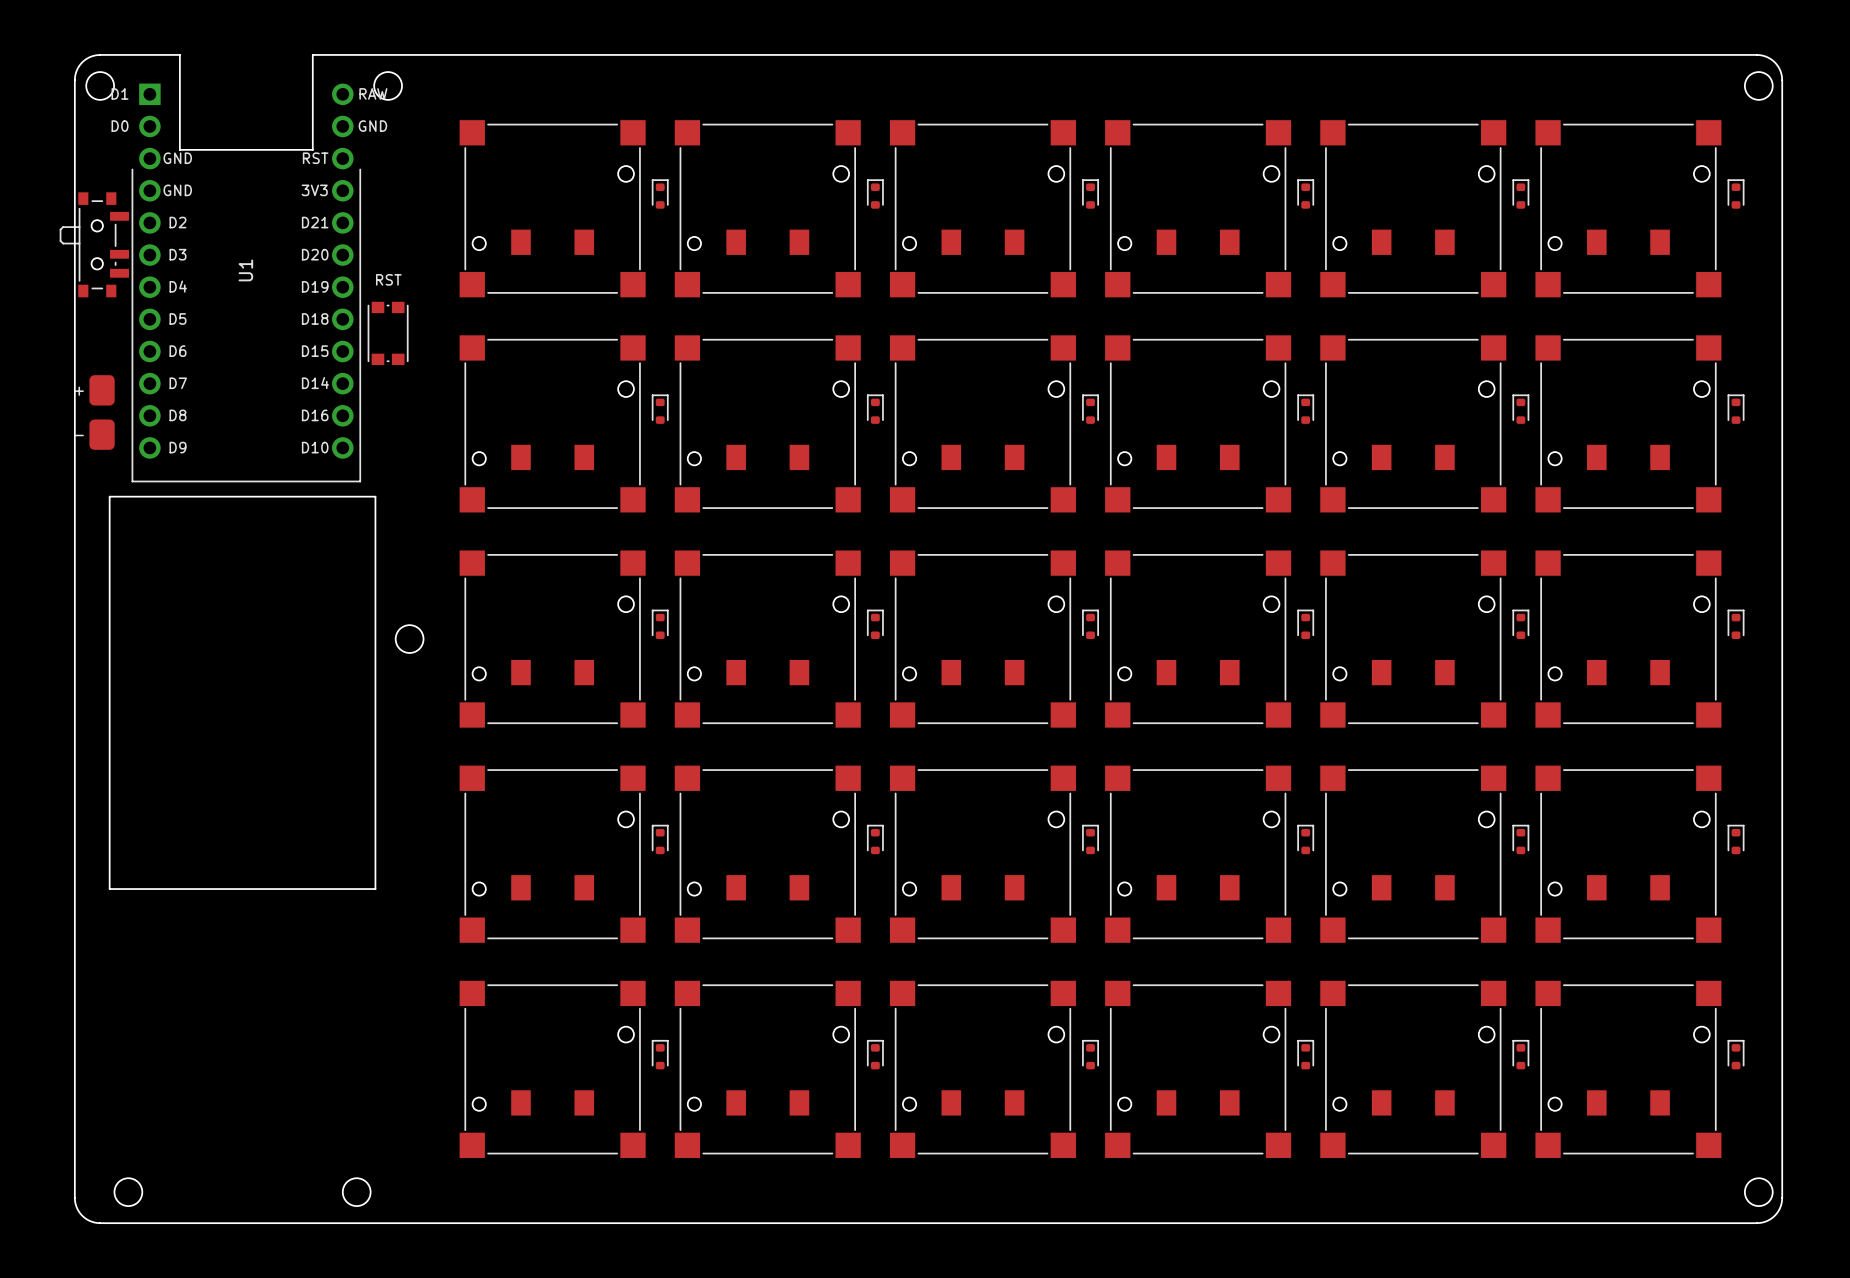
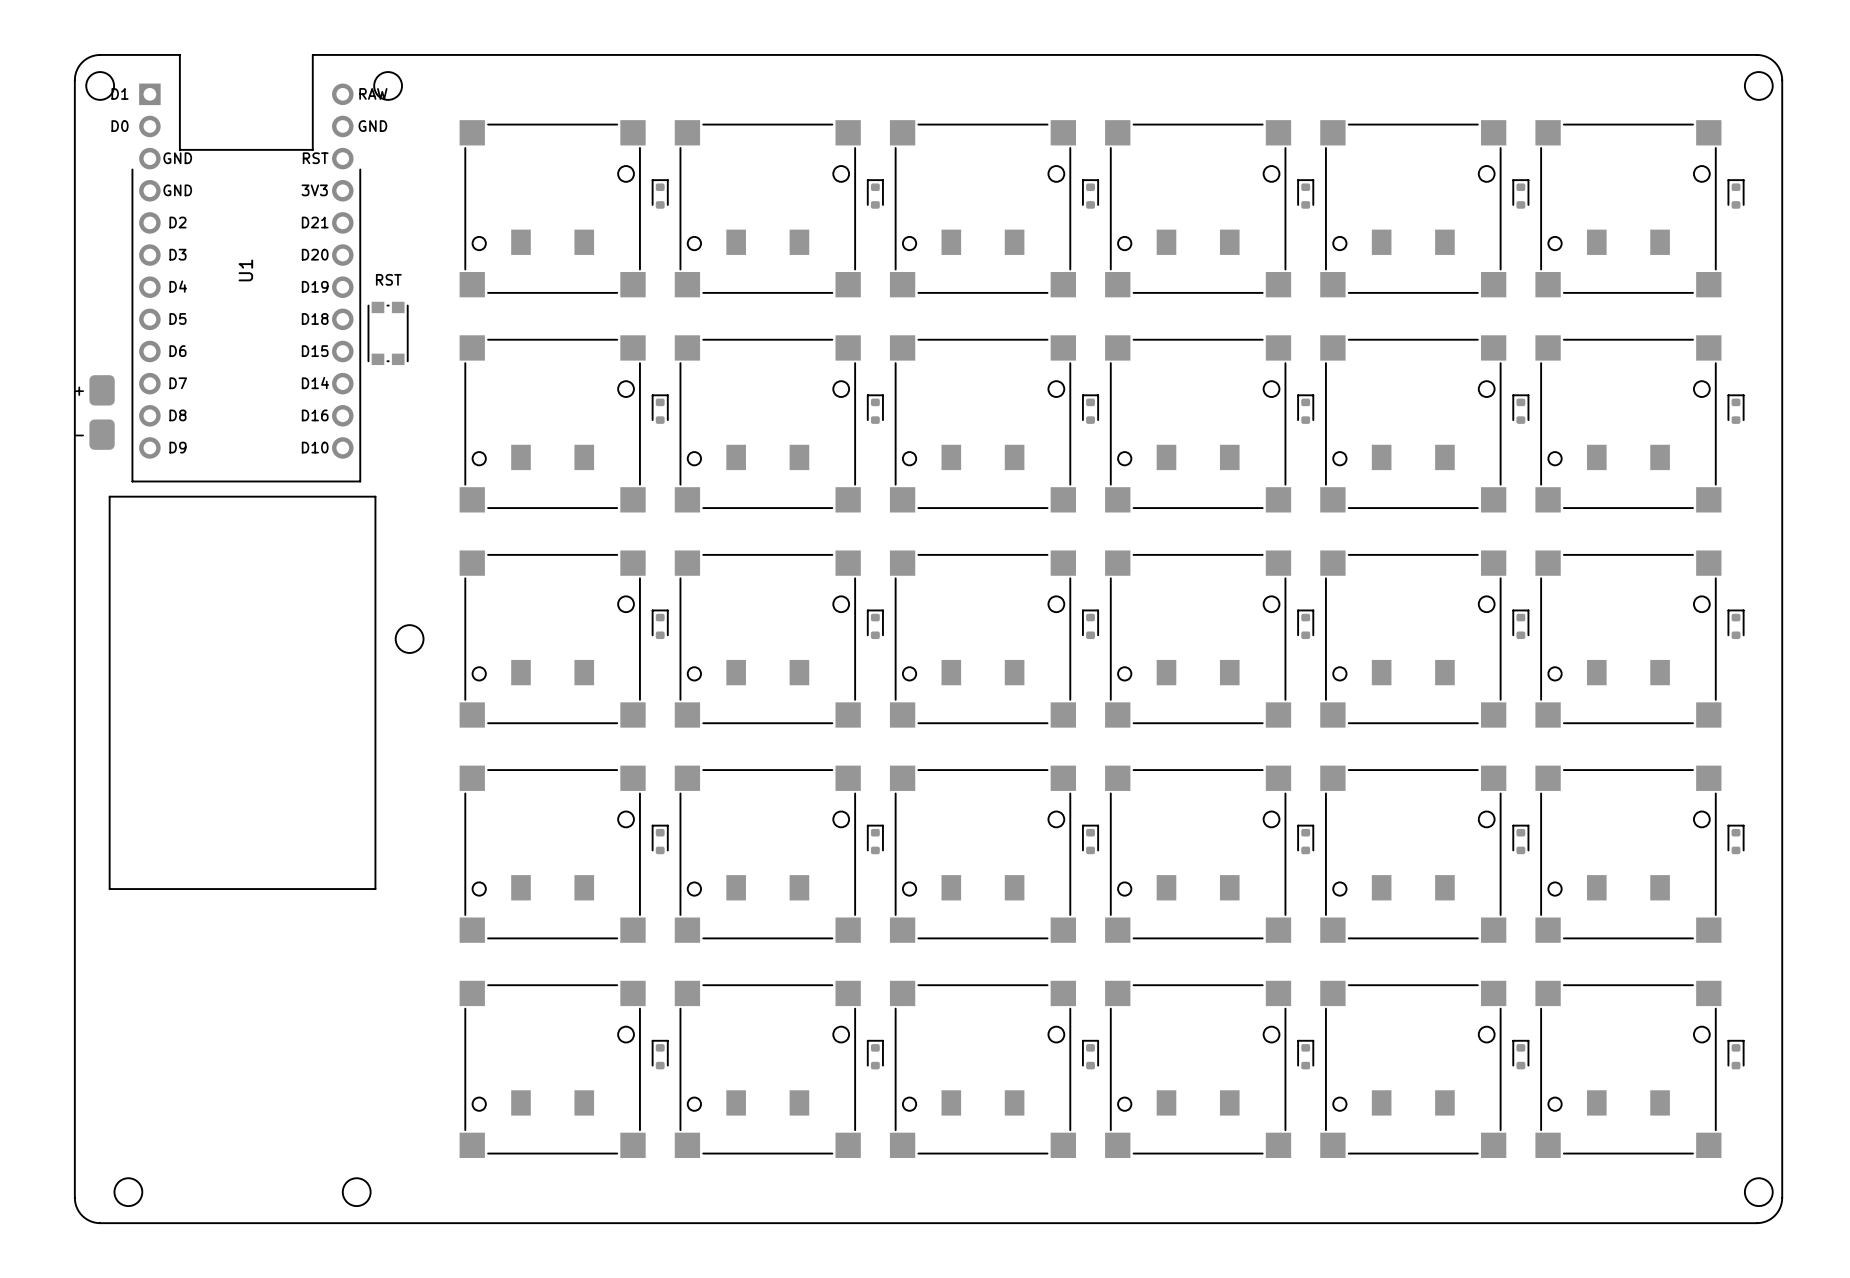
part: (94, 244) -> none

